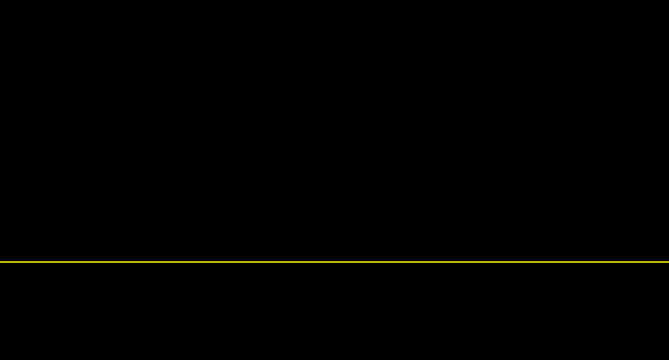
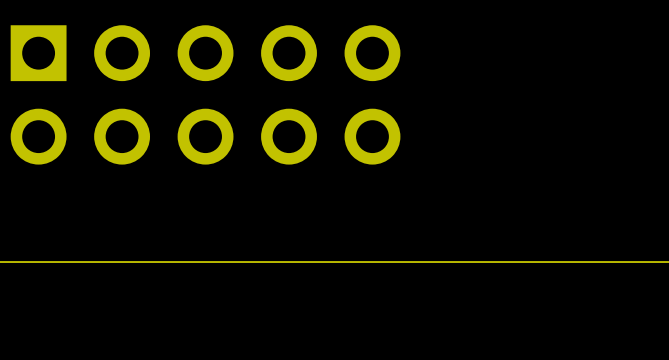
part: none -> (205, 94)

